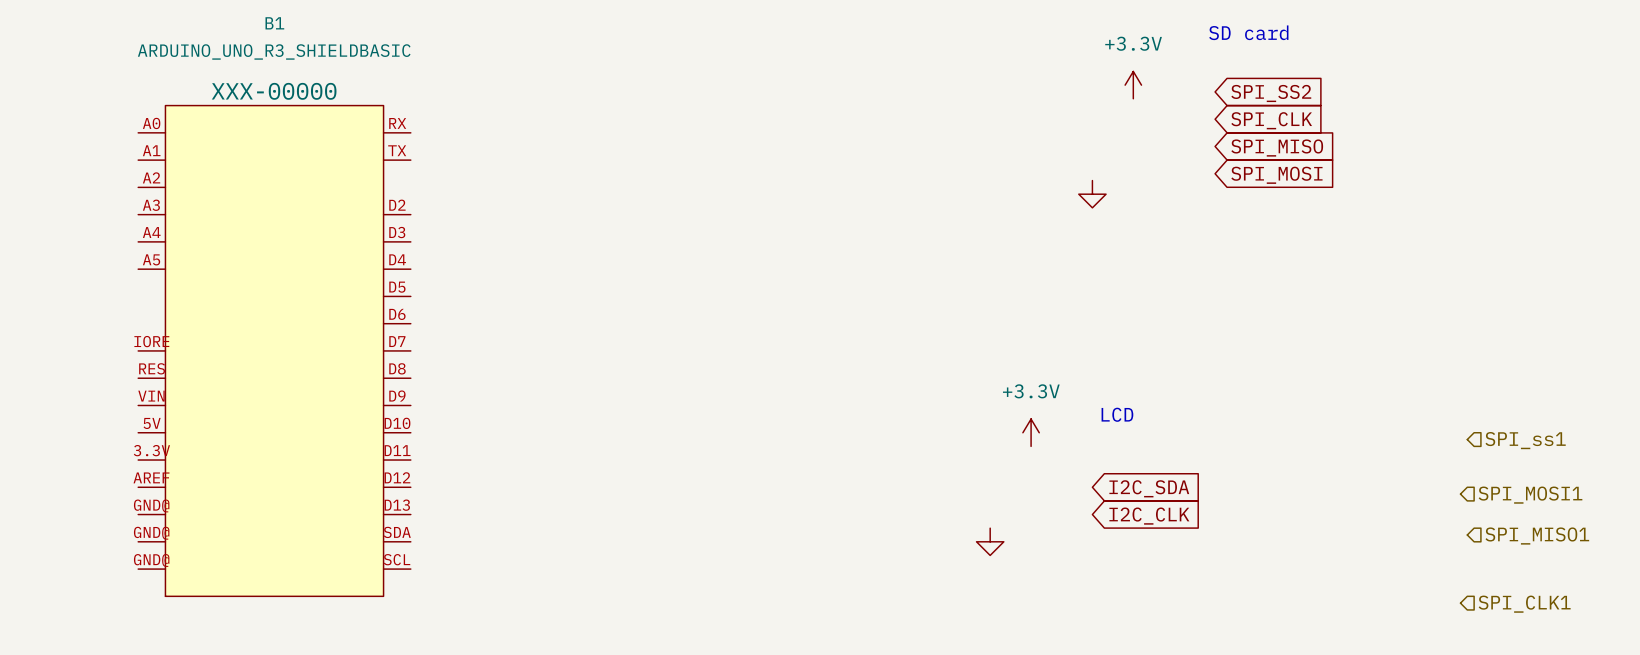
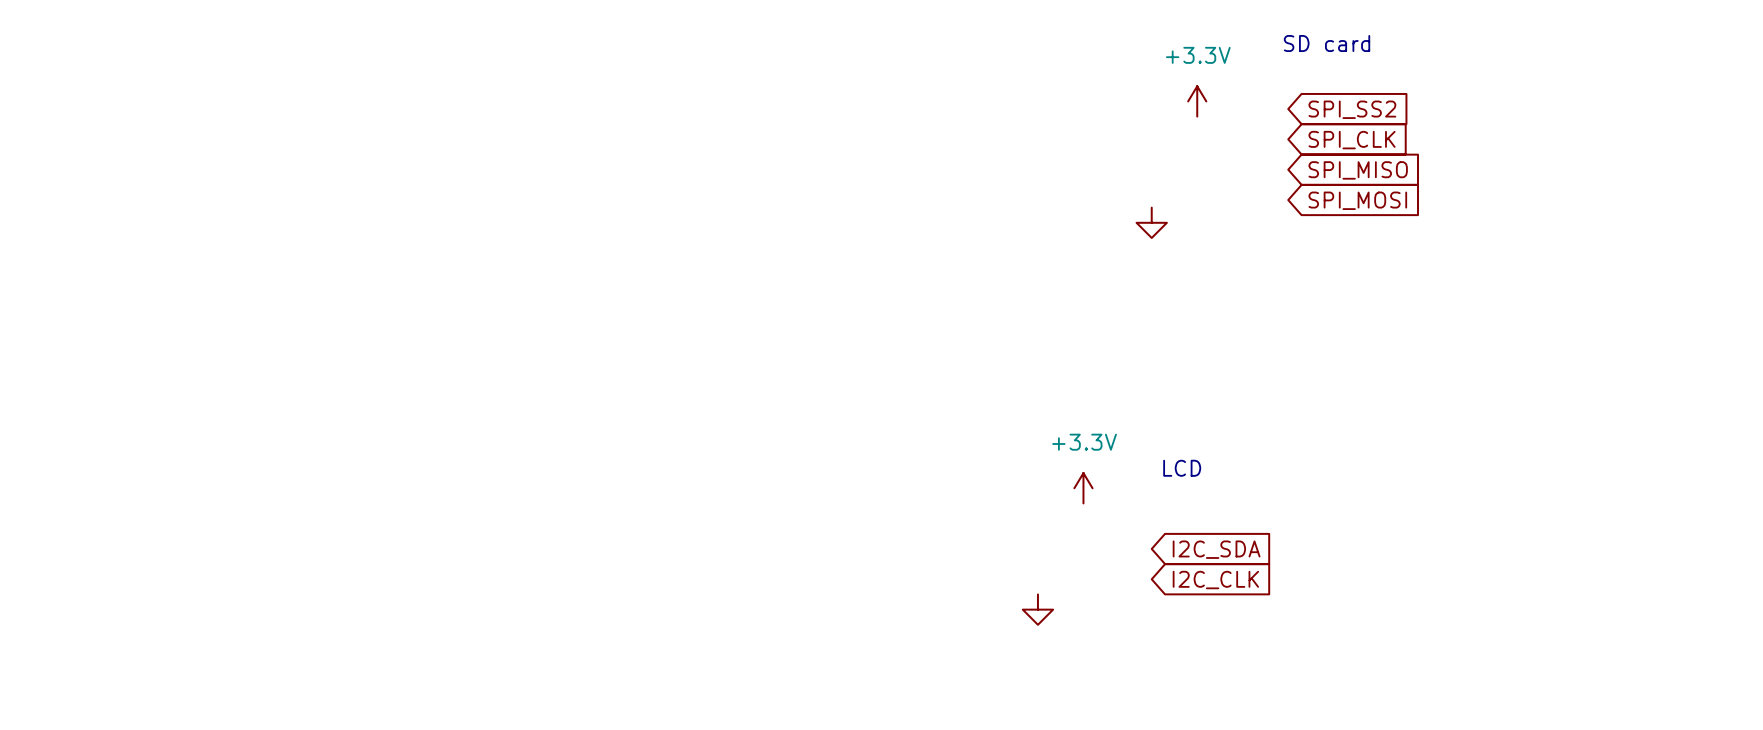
B1: ARDUINO_UNO_R3_SHIELDBASIC (274, 350) -> none
hierarchical label: SPI_ss1 (1525, 440) -> none
hierarchical label: SPI_MOSI1 (1530, 495) -> none
hierarchical label: SPI_MISO1 (1537, 536) -> none
hierarchical label: SPI_CLK1 (1524, 604) -> none

